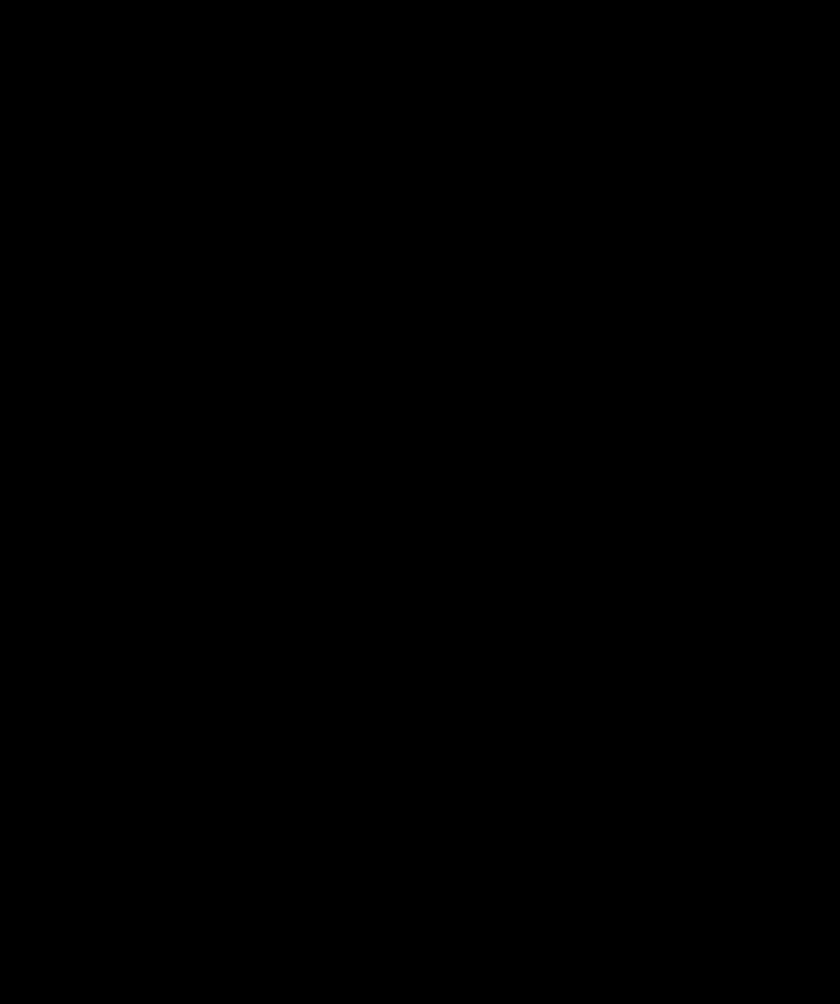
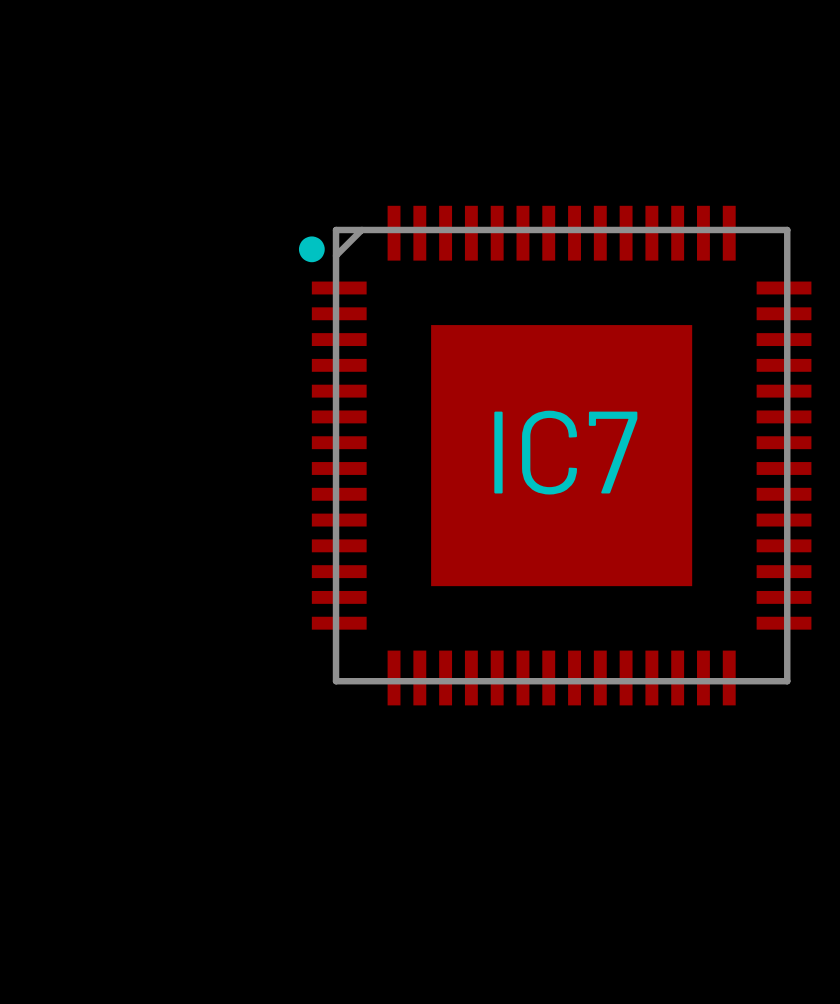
IC7: none -> (555, 455)

